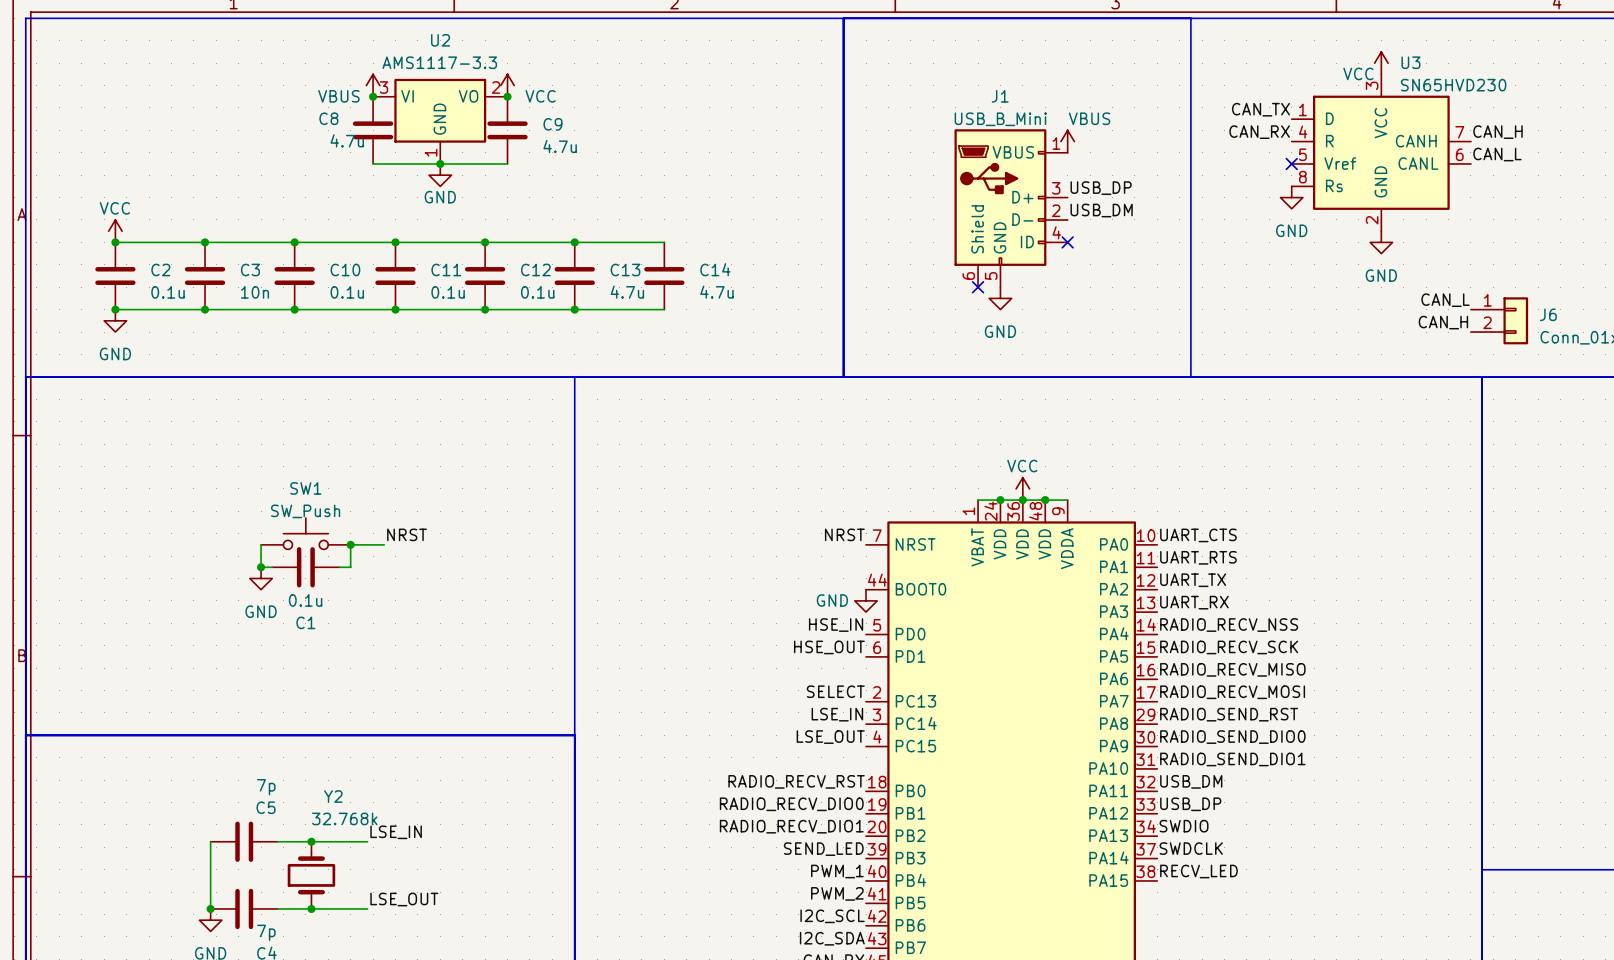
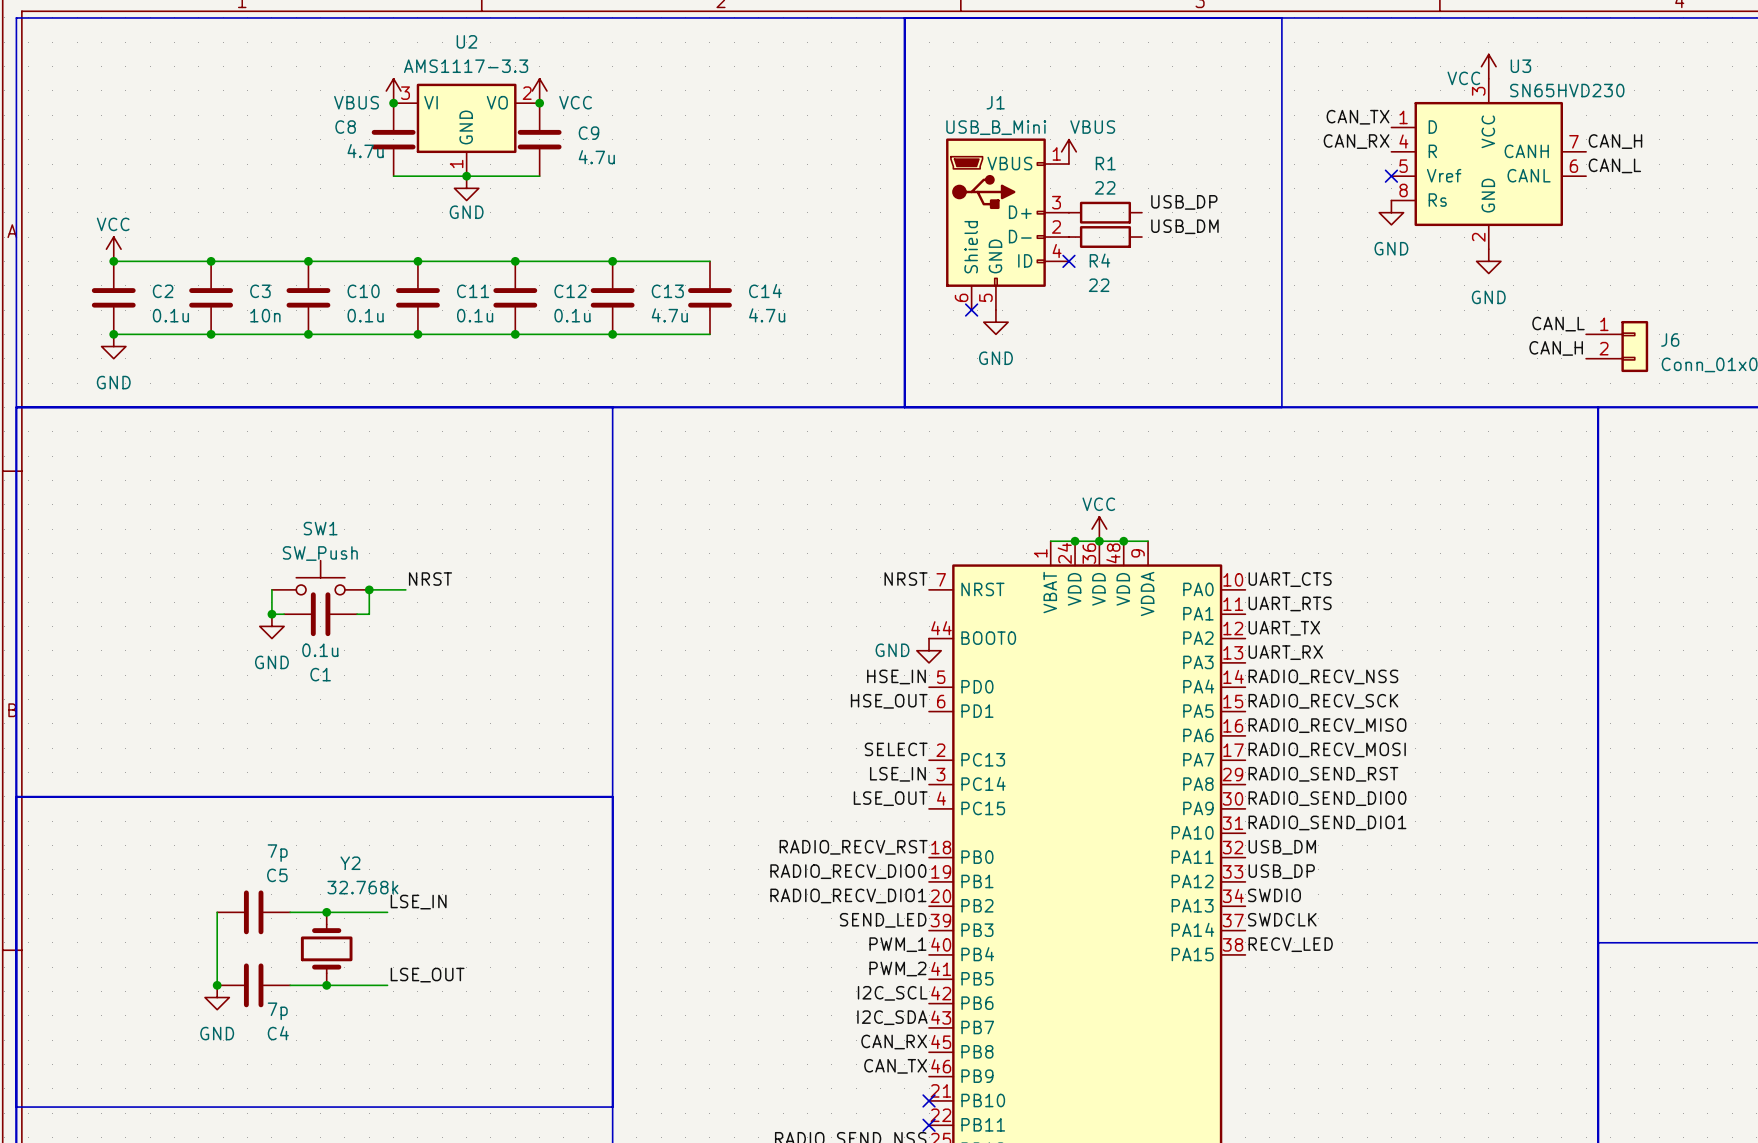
power symbol position: VBUS (1067, 141) -> VBUS (1068, 151)
R1: none -> 22 (1105, 212)
J1 position: (1011, 208) -> (1007, 224)
R4: none -> 22 (1105, 237)
no-connect mark: none -> (1068, 261)
no-connect mark: (1067, 242) -> none
no-connect mark: none -> (971, 310)
no-connect mark: (978, 287) -> none
power symbol position: GND (1000, 298) -> GND (995, 322)

